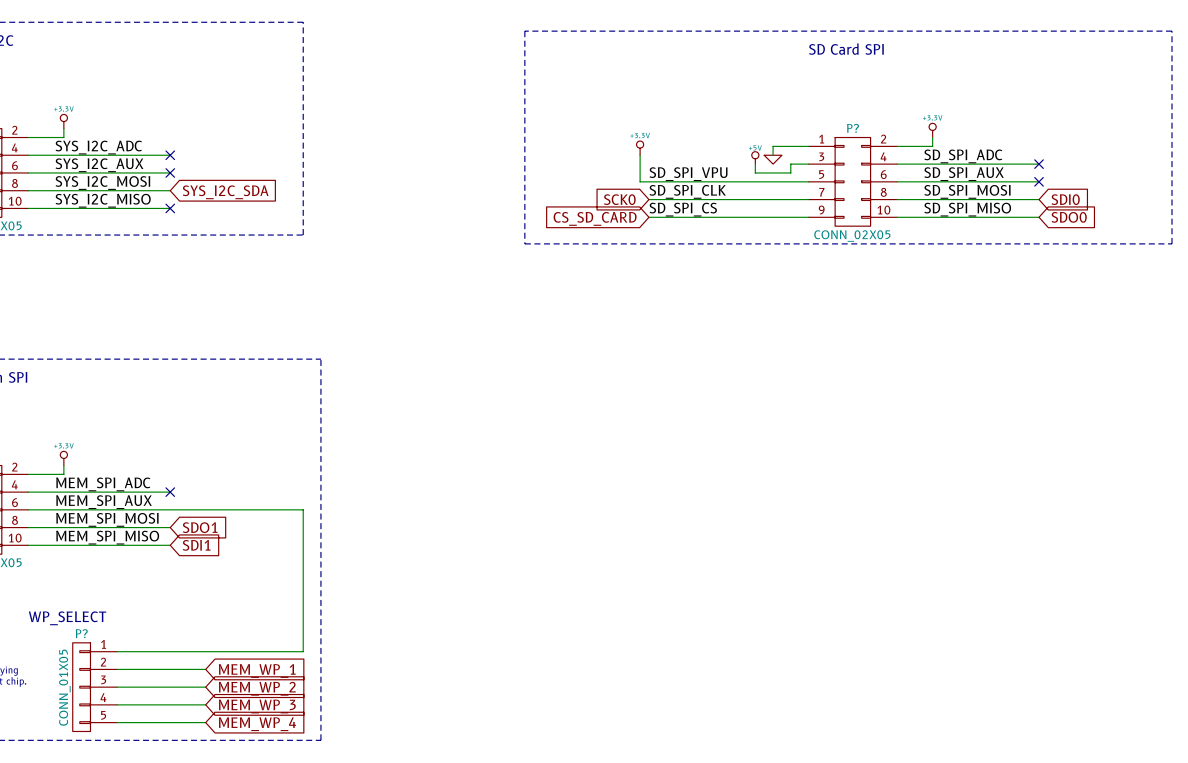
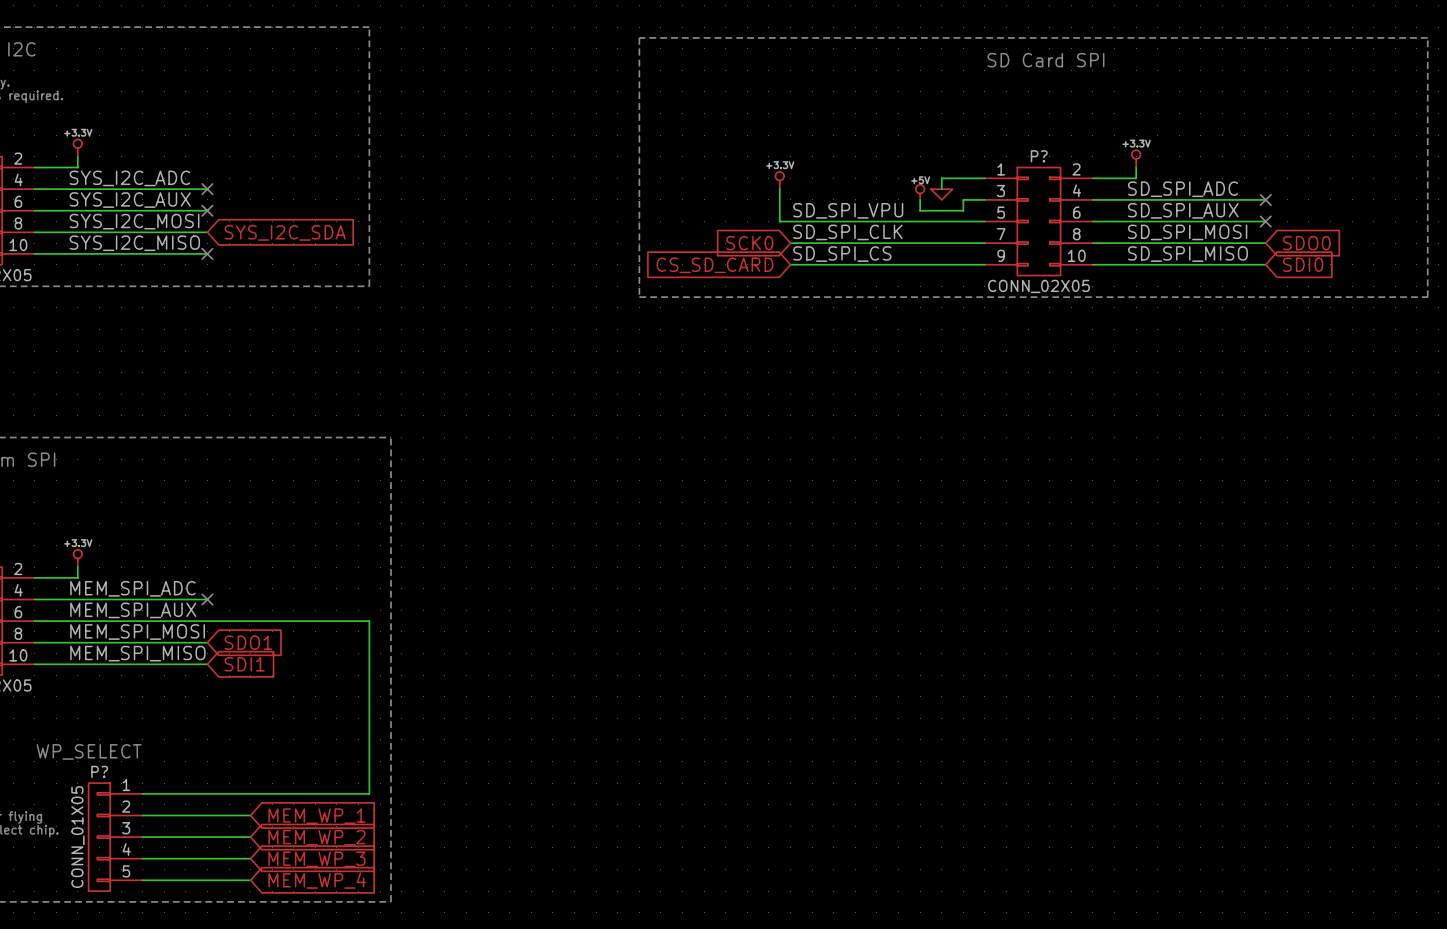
global label: SDI0 (1065, 199) -> SDO0 (1306, 243)
global label: SDO0 (1069, 217) -> SDI0 (1303, 264)

